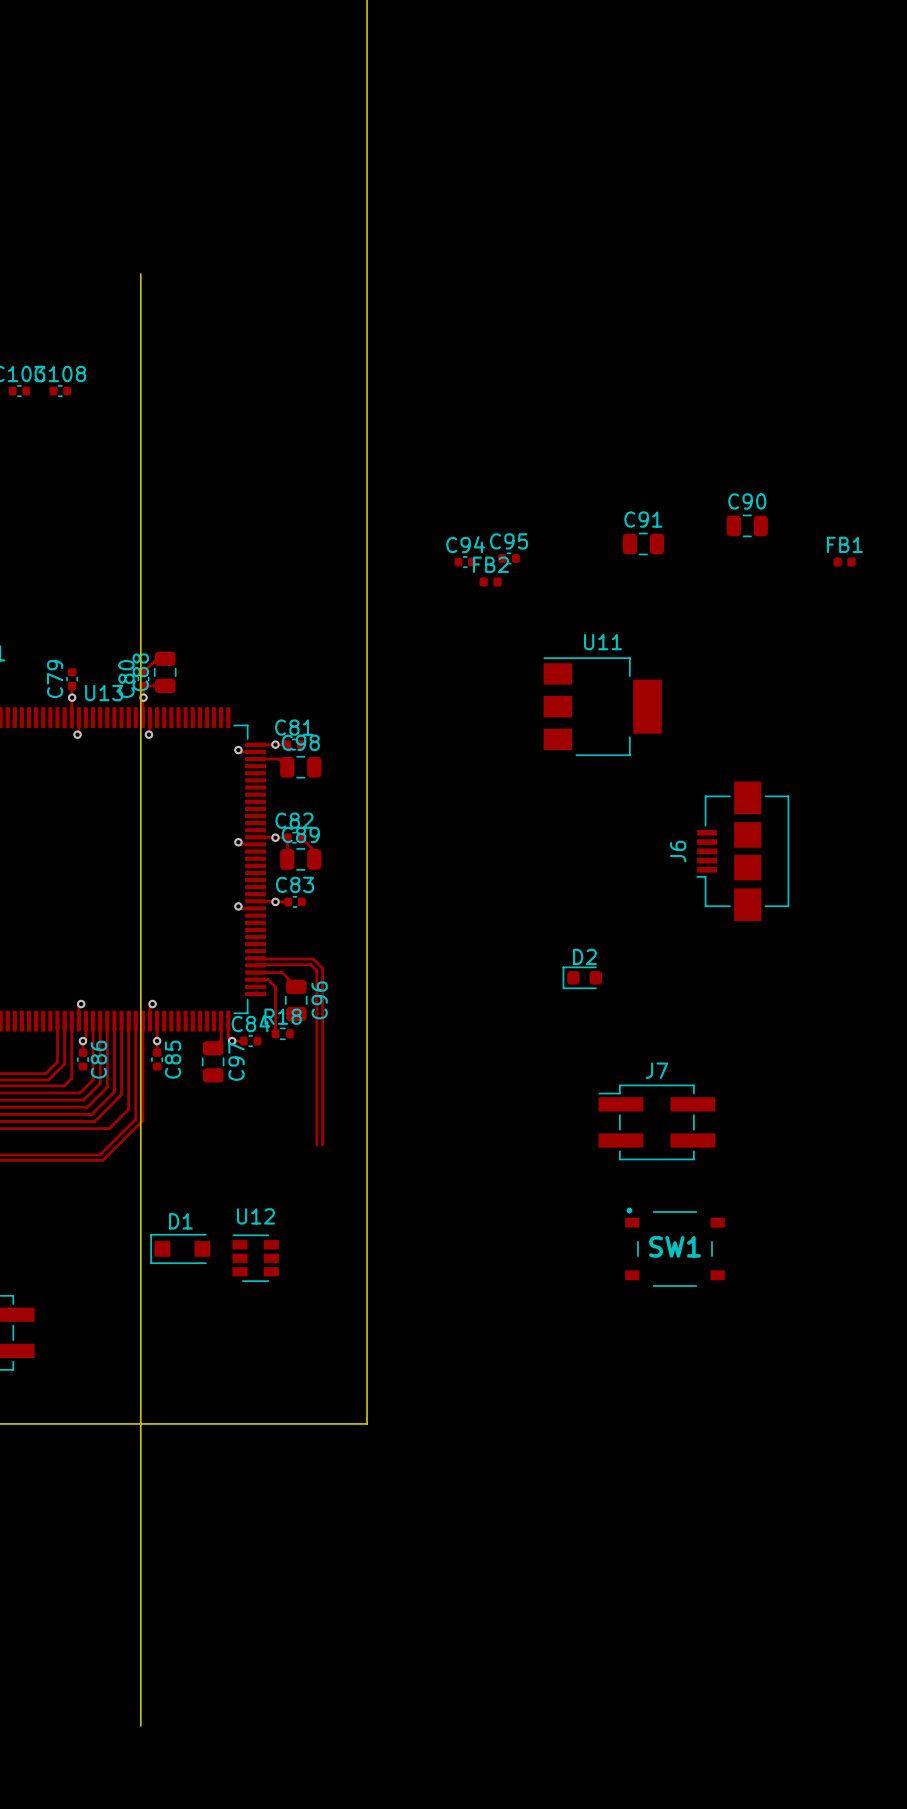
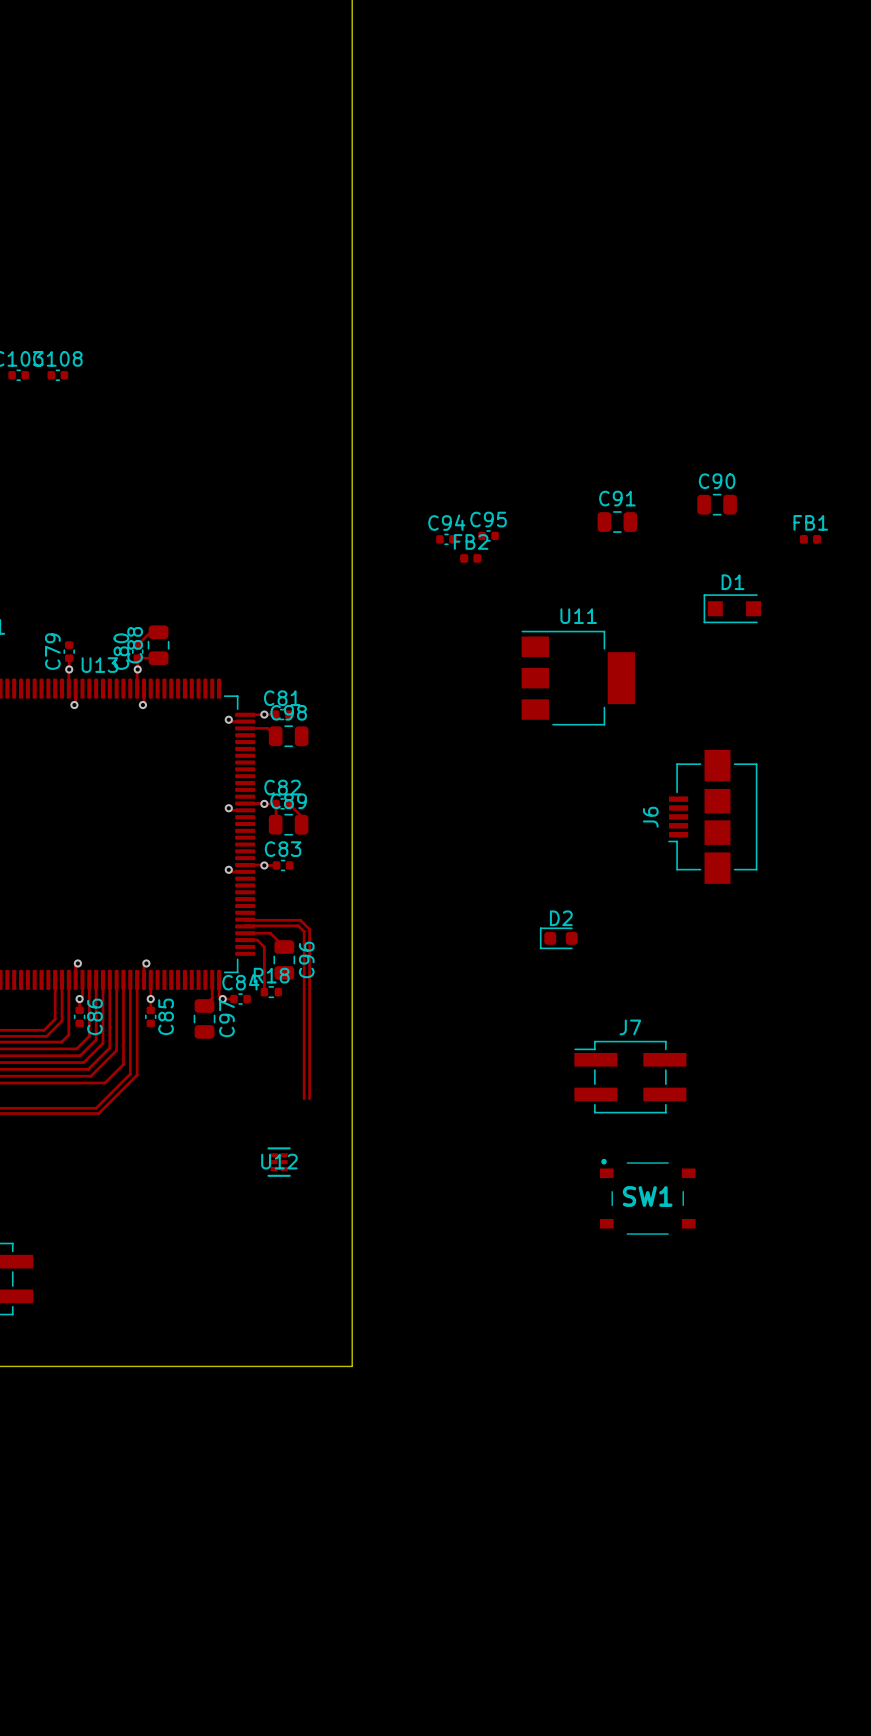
board edge: (140, 274) (140, 1725) -> none
U12 name position: U12 (255, 1216) -> U12 (279, 1161)
U12 footprint: [232, 1234, 279, 1282] -> [267, 1147, 291, 1177]
D1 position: (180, 1248) -> (732, 608)

